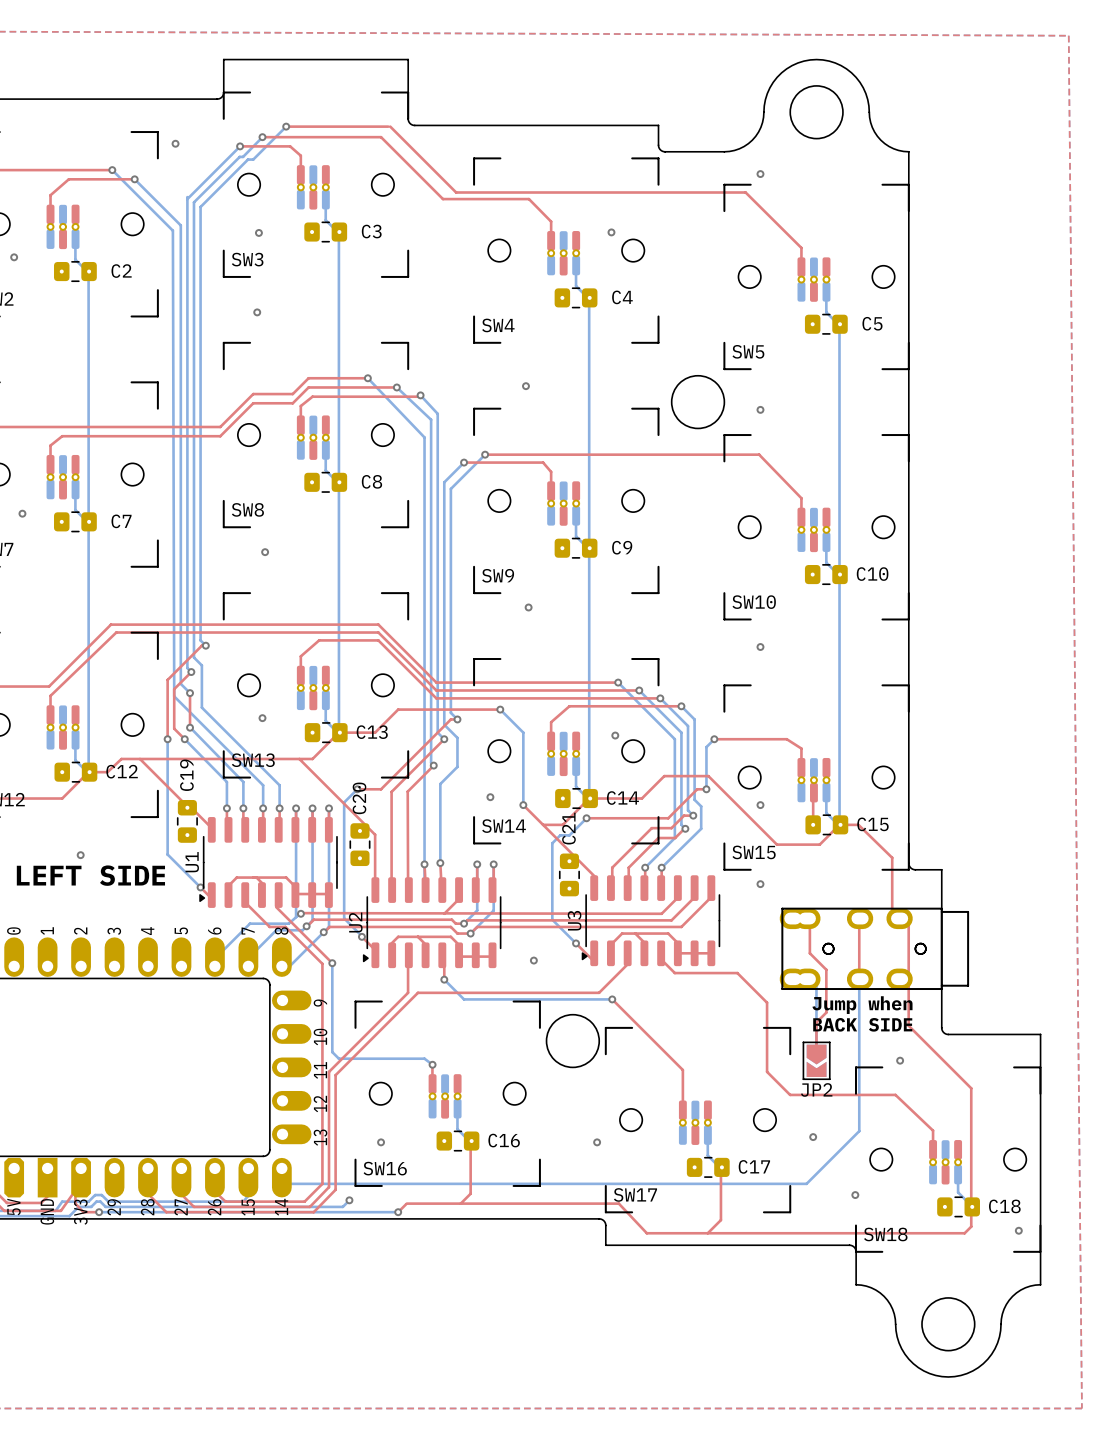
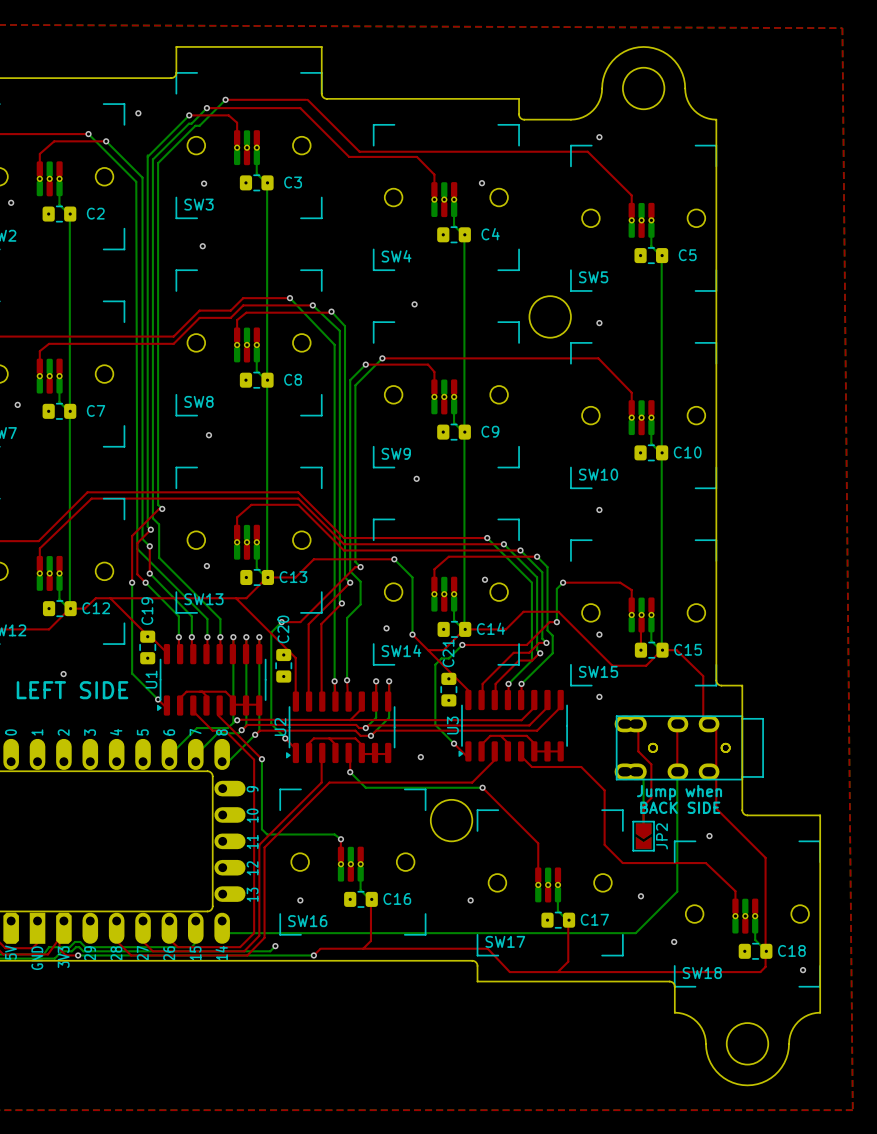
JP2 name rotation: 0° (816, 1089) -> 90° counterclockwise (661, 836)

